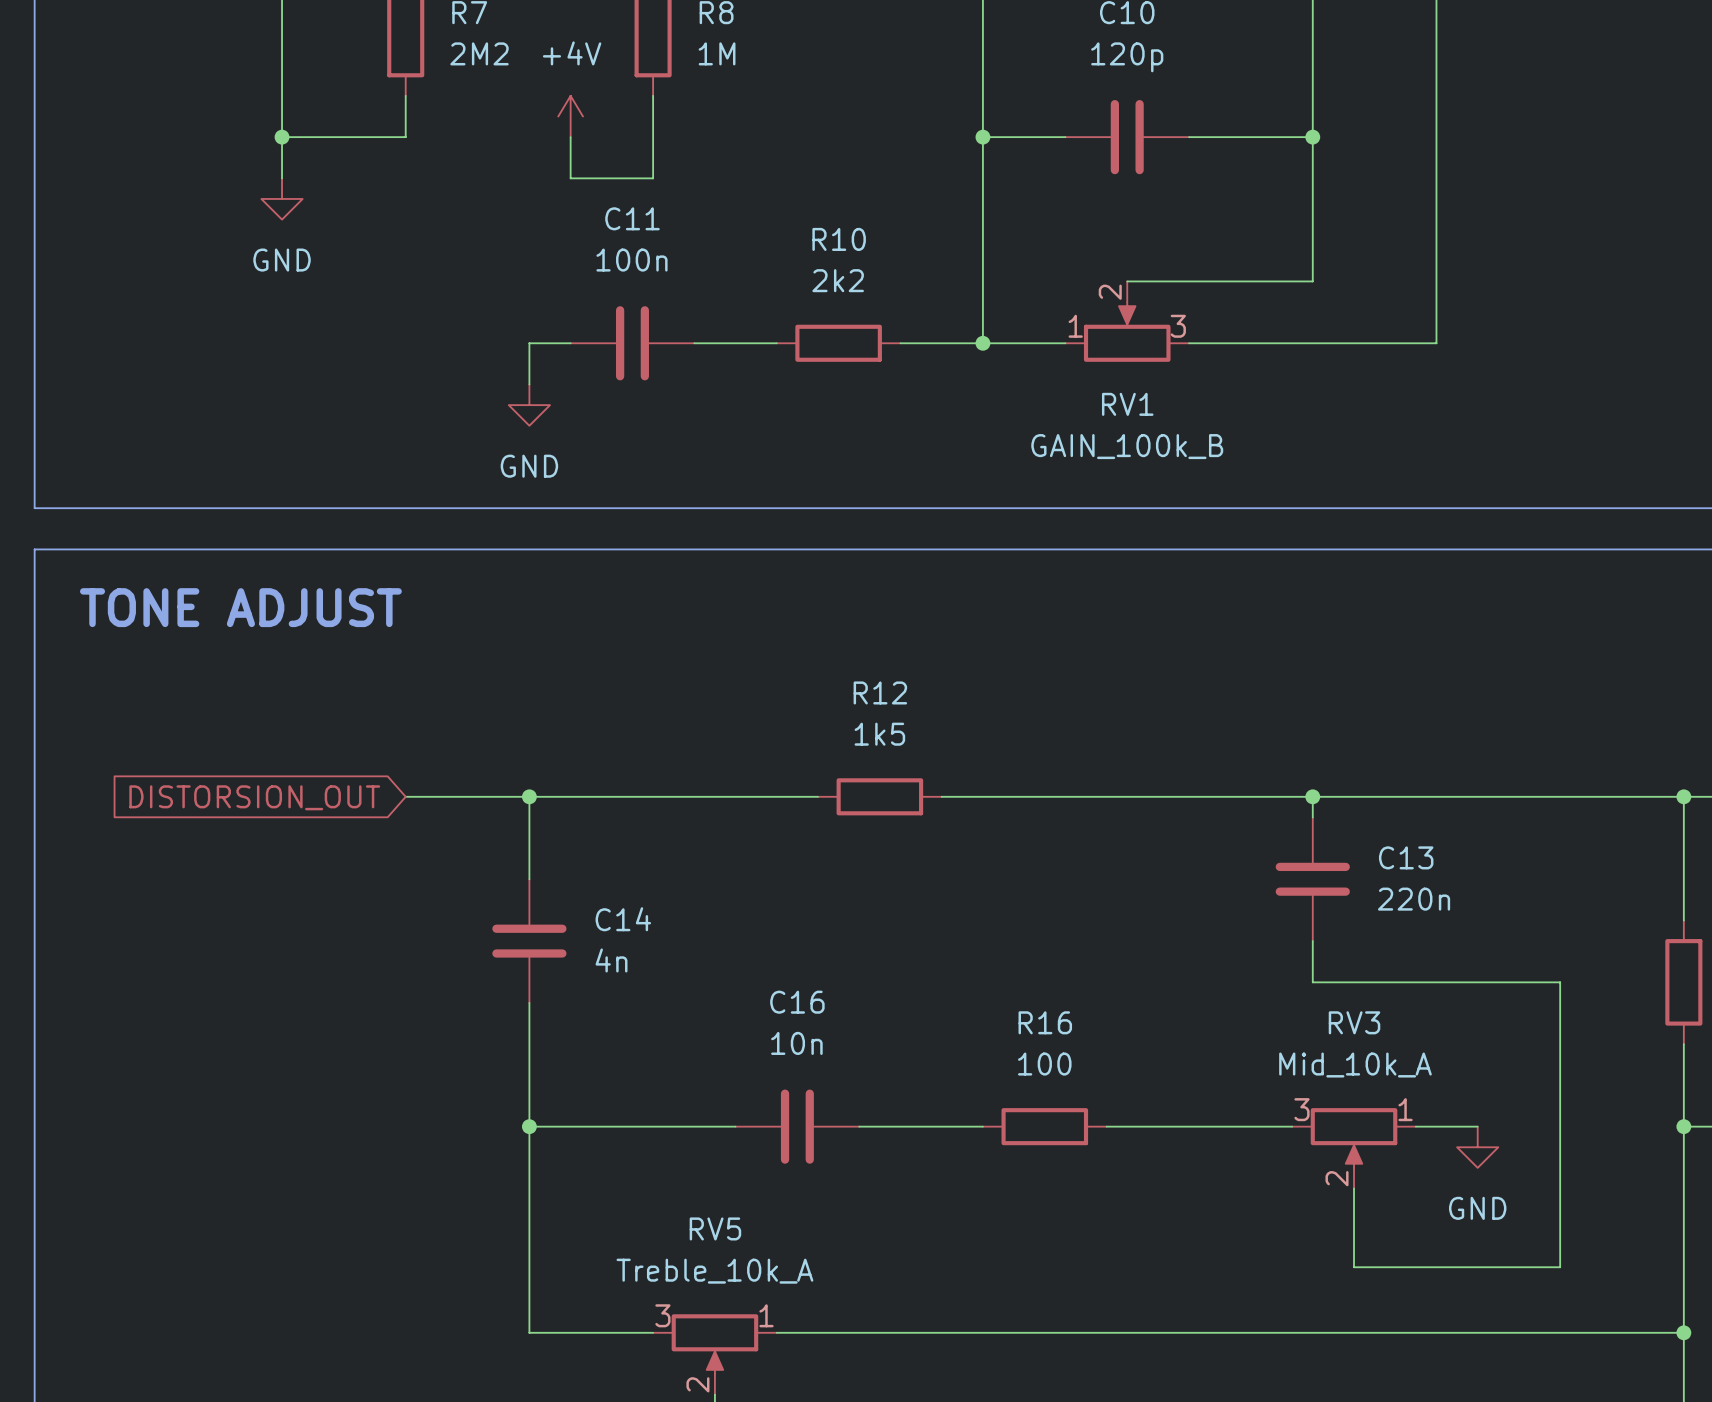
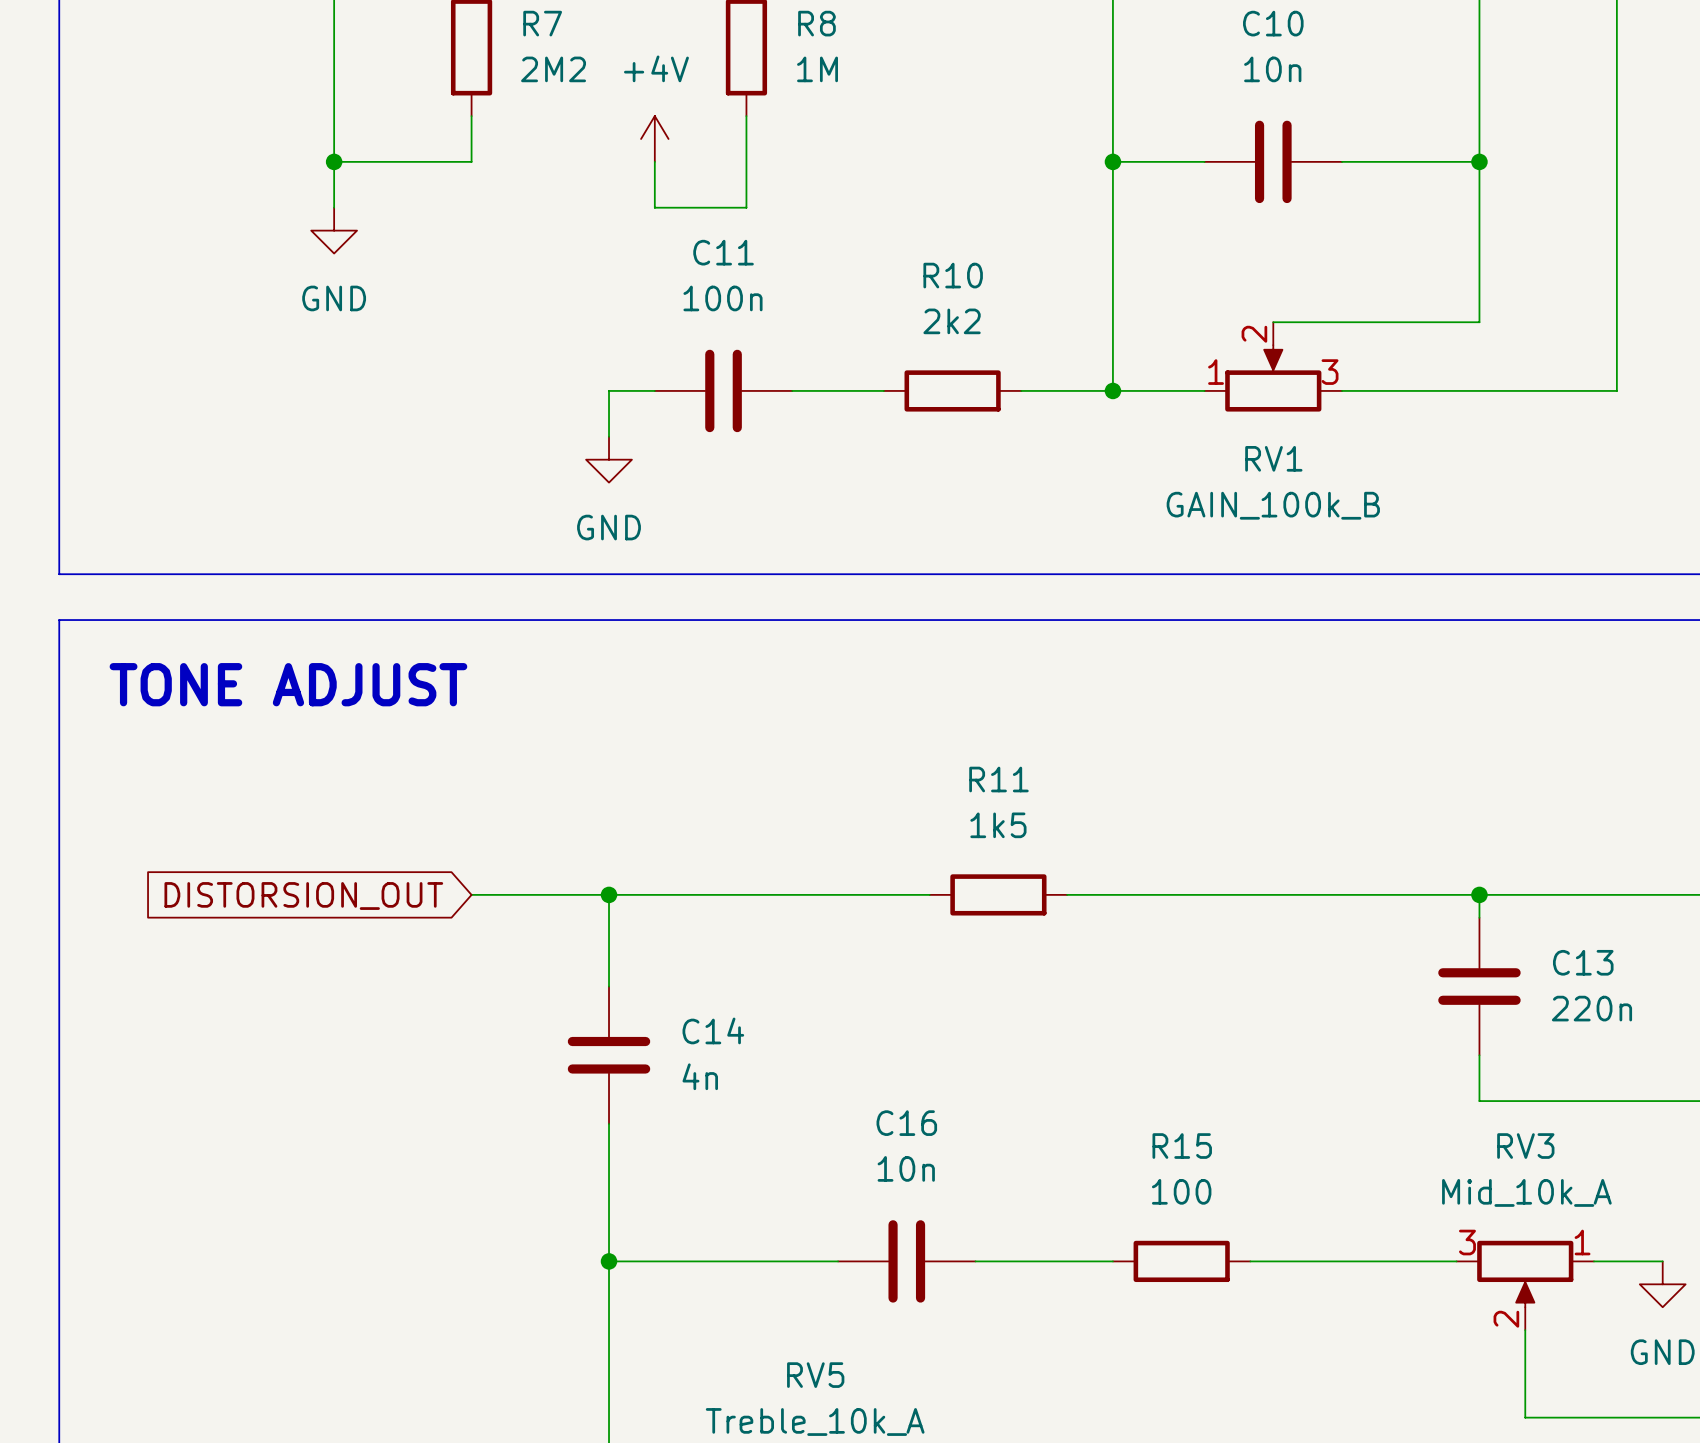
C10 value: 120p (1127, 57) -> 10n (1272, 69)
R12 name: R12 (880, 692) -> R11 (998, 779)
R16 name: R16 (1045, 1022) -> R15 (1182, 1146)

